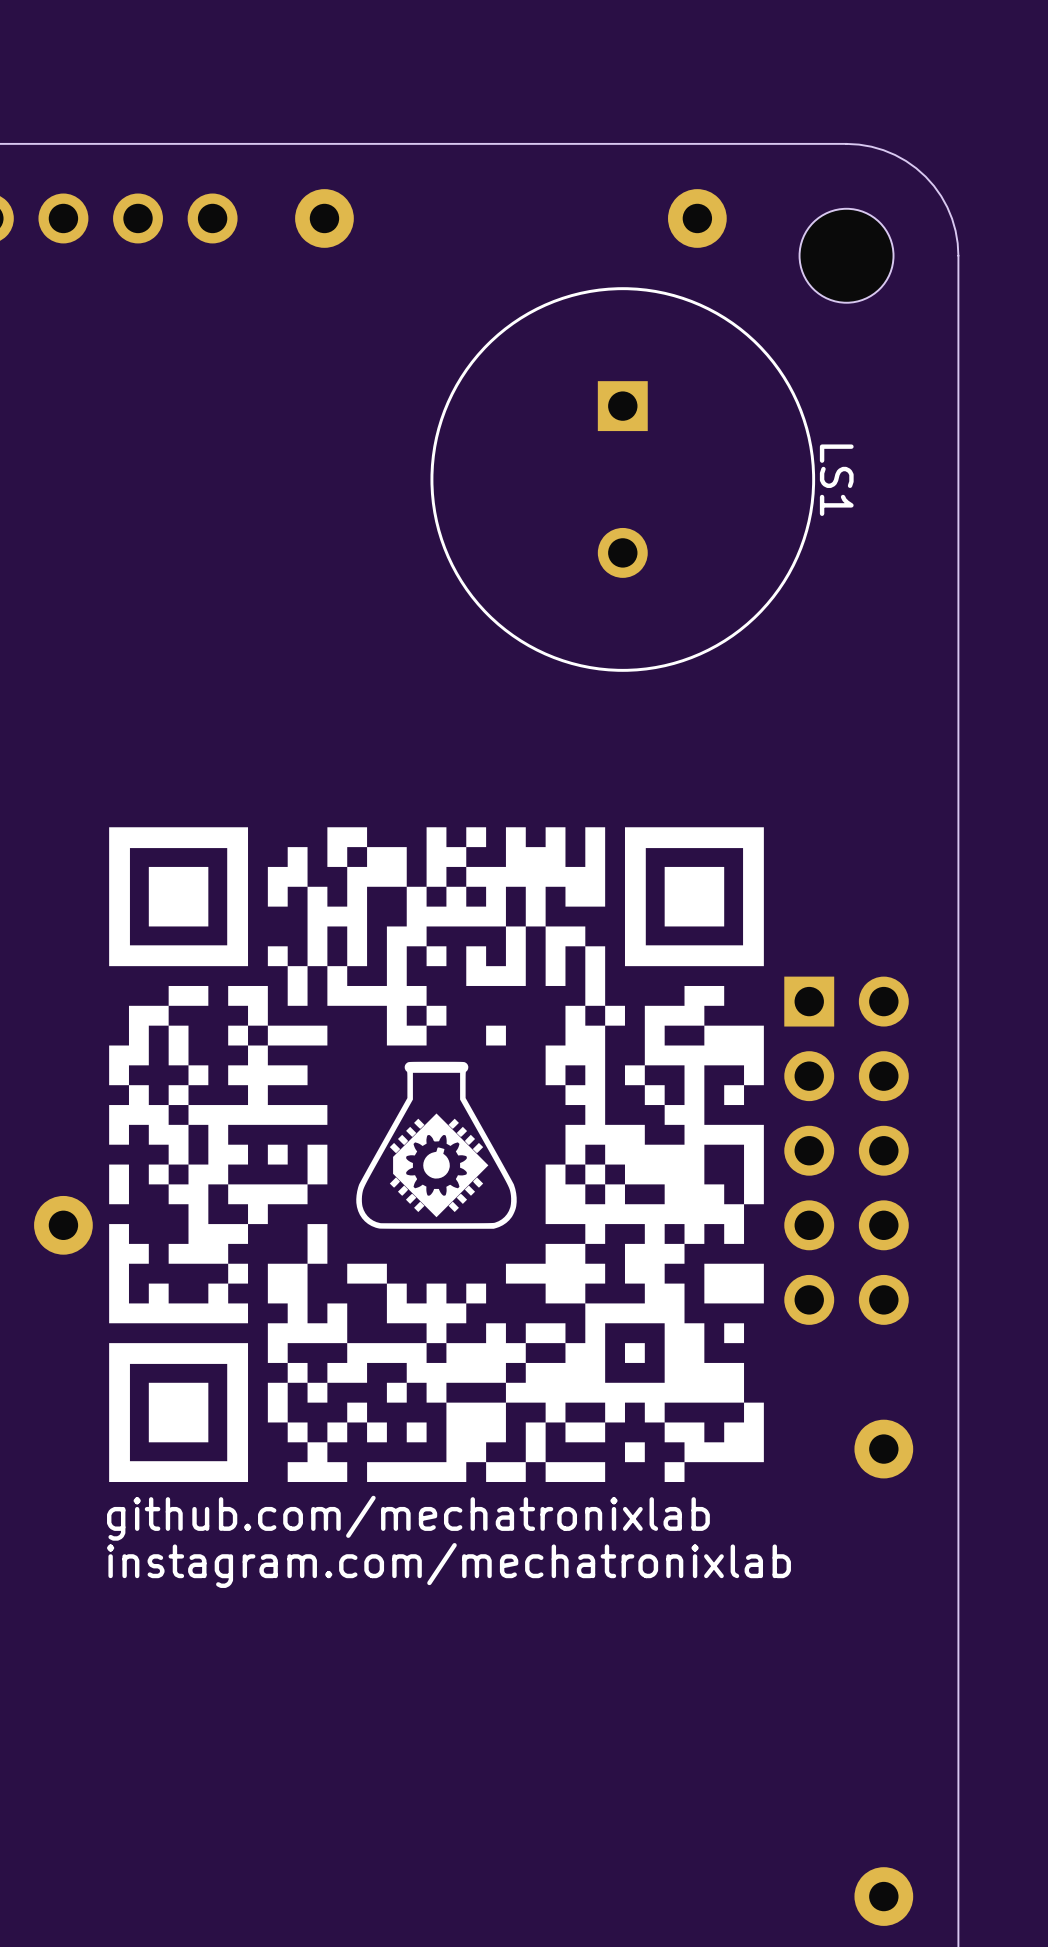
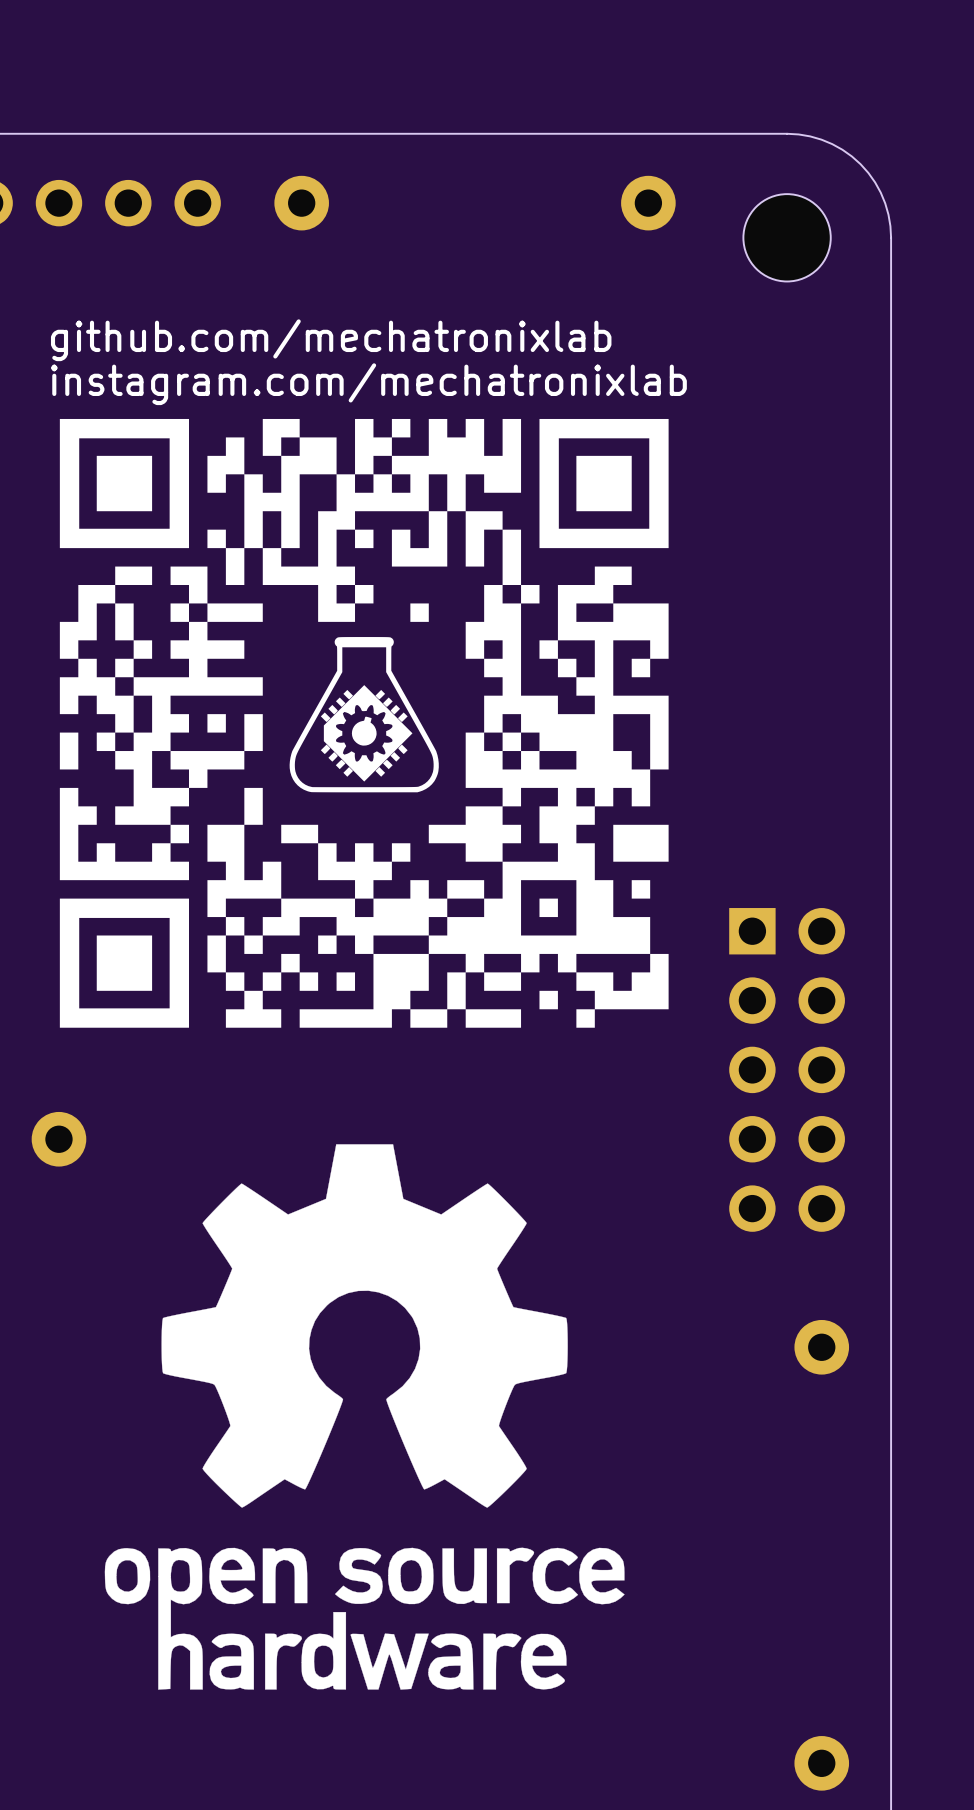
text: none -> github.com/mechatronixlab (331, 340)
text: none -> instagram.com/mechatronixlab (368, 384)
LS1: (622, 479) -> none
drawing position: (436, 1154) -> (364, 723)
drawing: none -> [104, 1144, 625, 1690]
text: github.com/mechatronixlab (408, 1518) -> none
text: instagram.com/mechatronixlab (448, 1565) -> none

